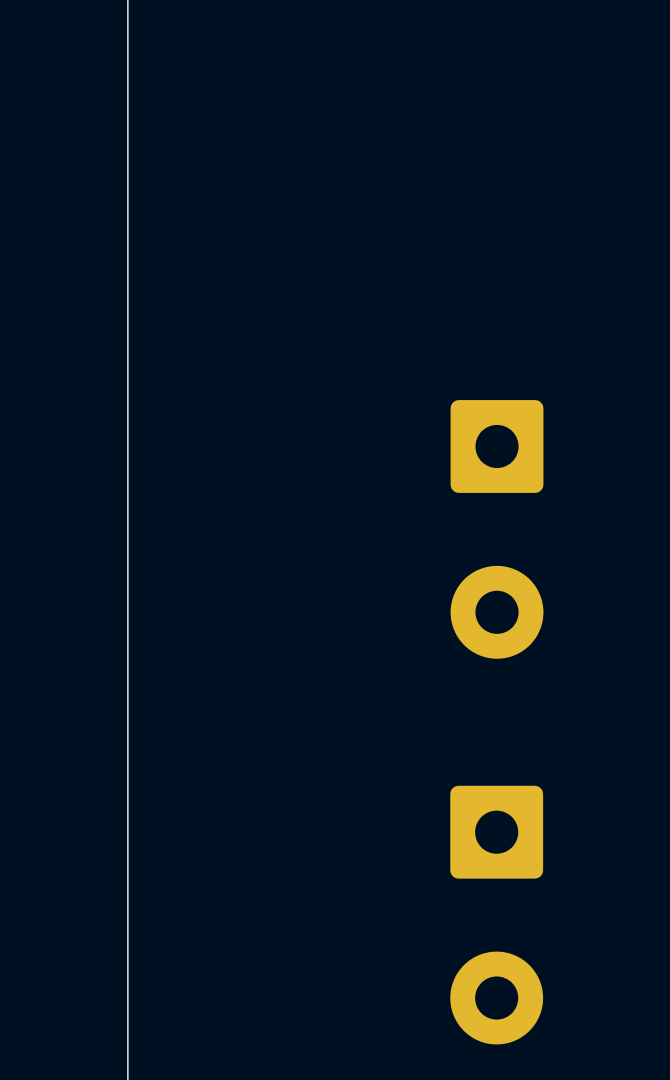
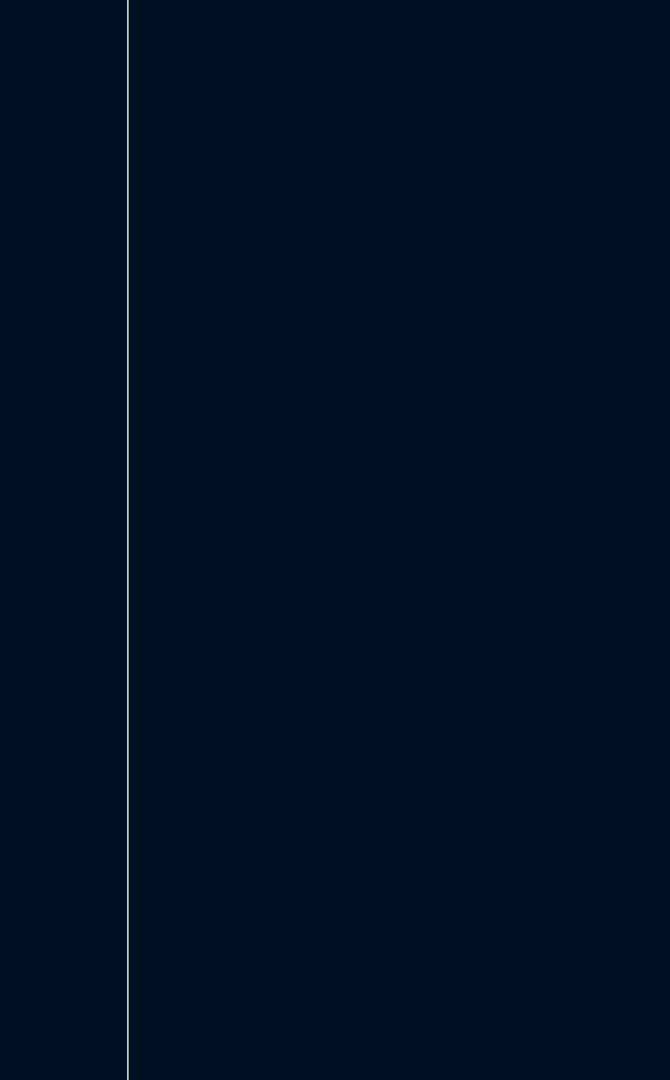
part: (497, 529) -> none
part: (496, 915) -> none

